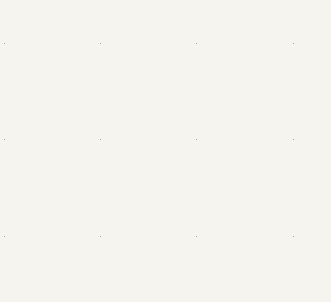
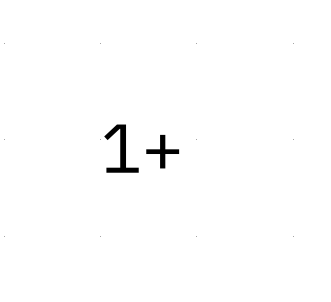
text: none -> 1+ (141, 148)

